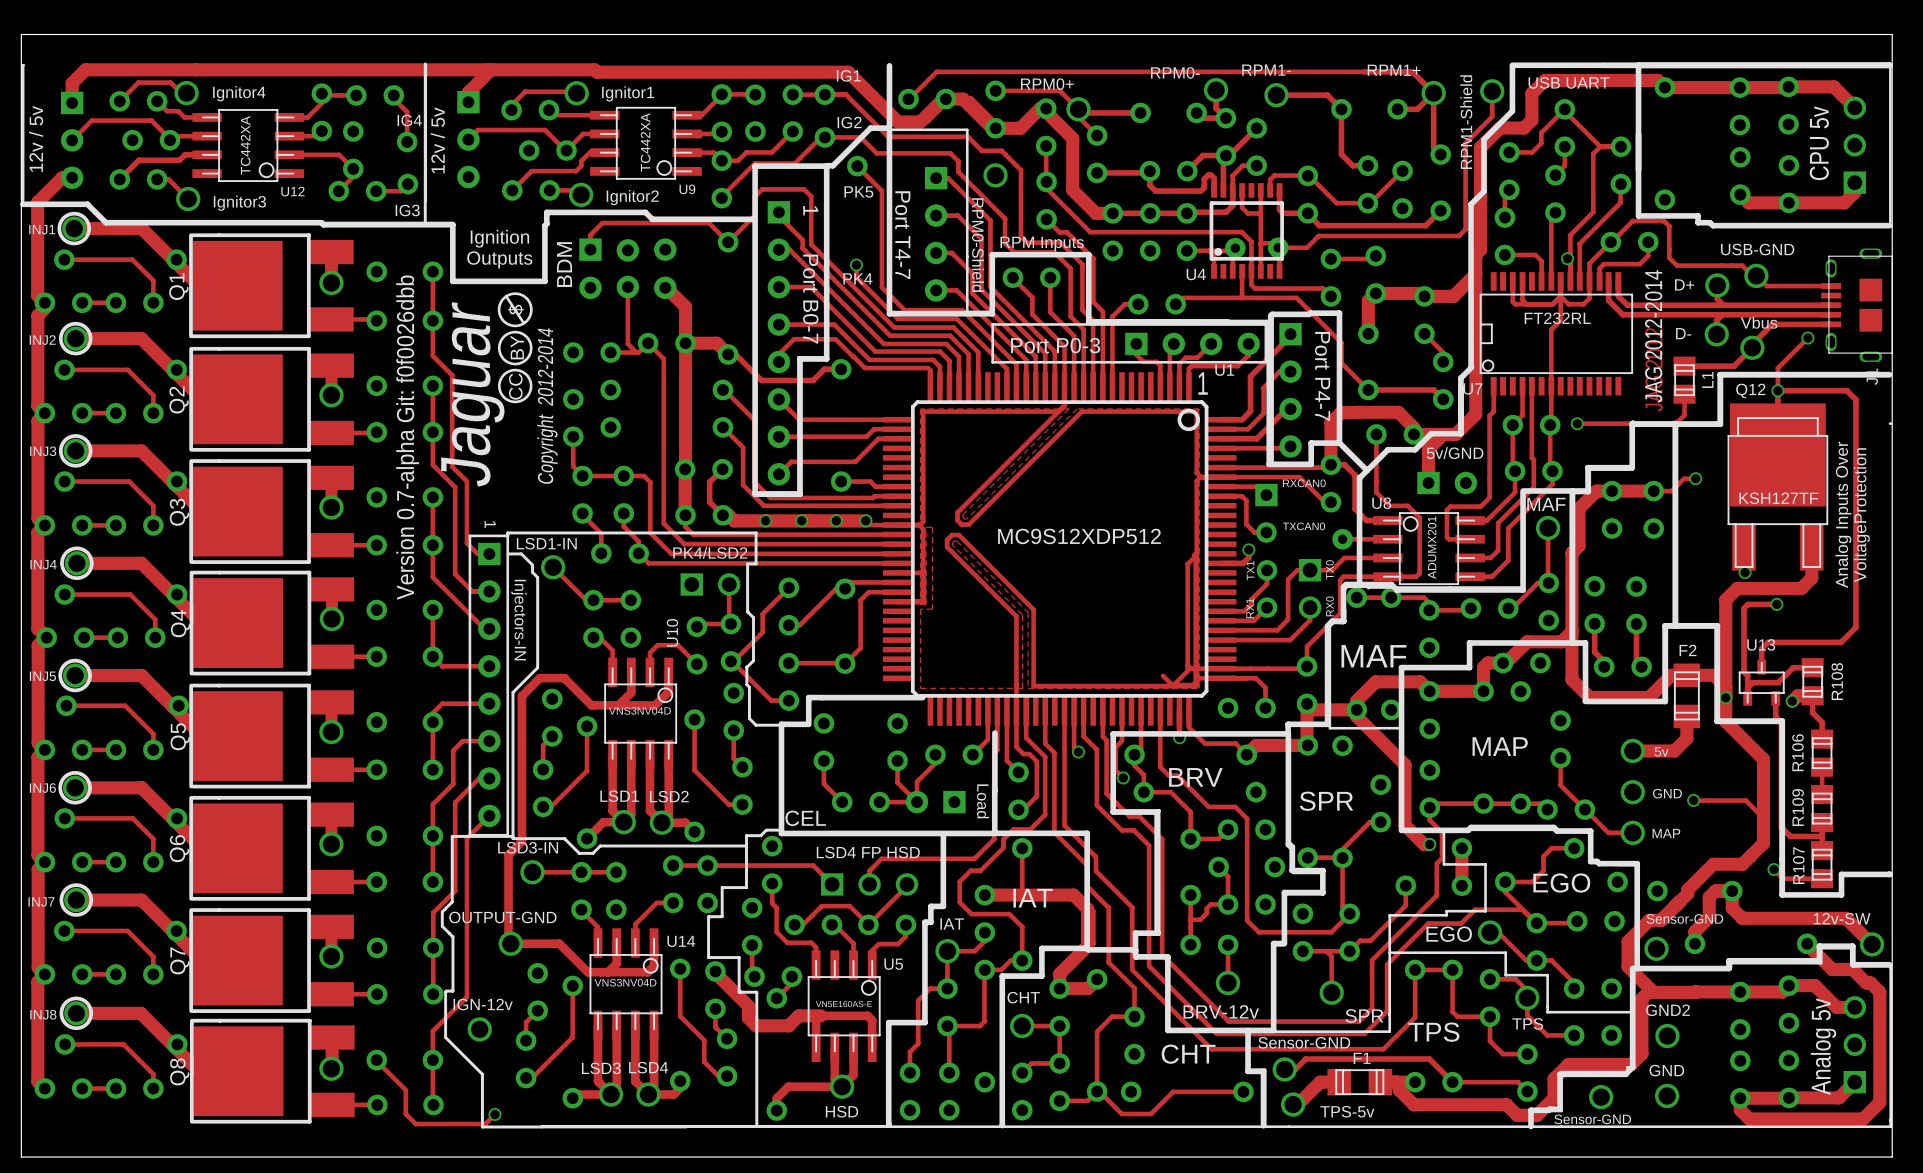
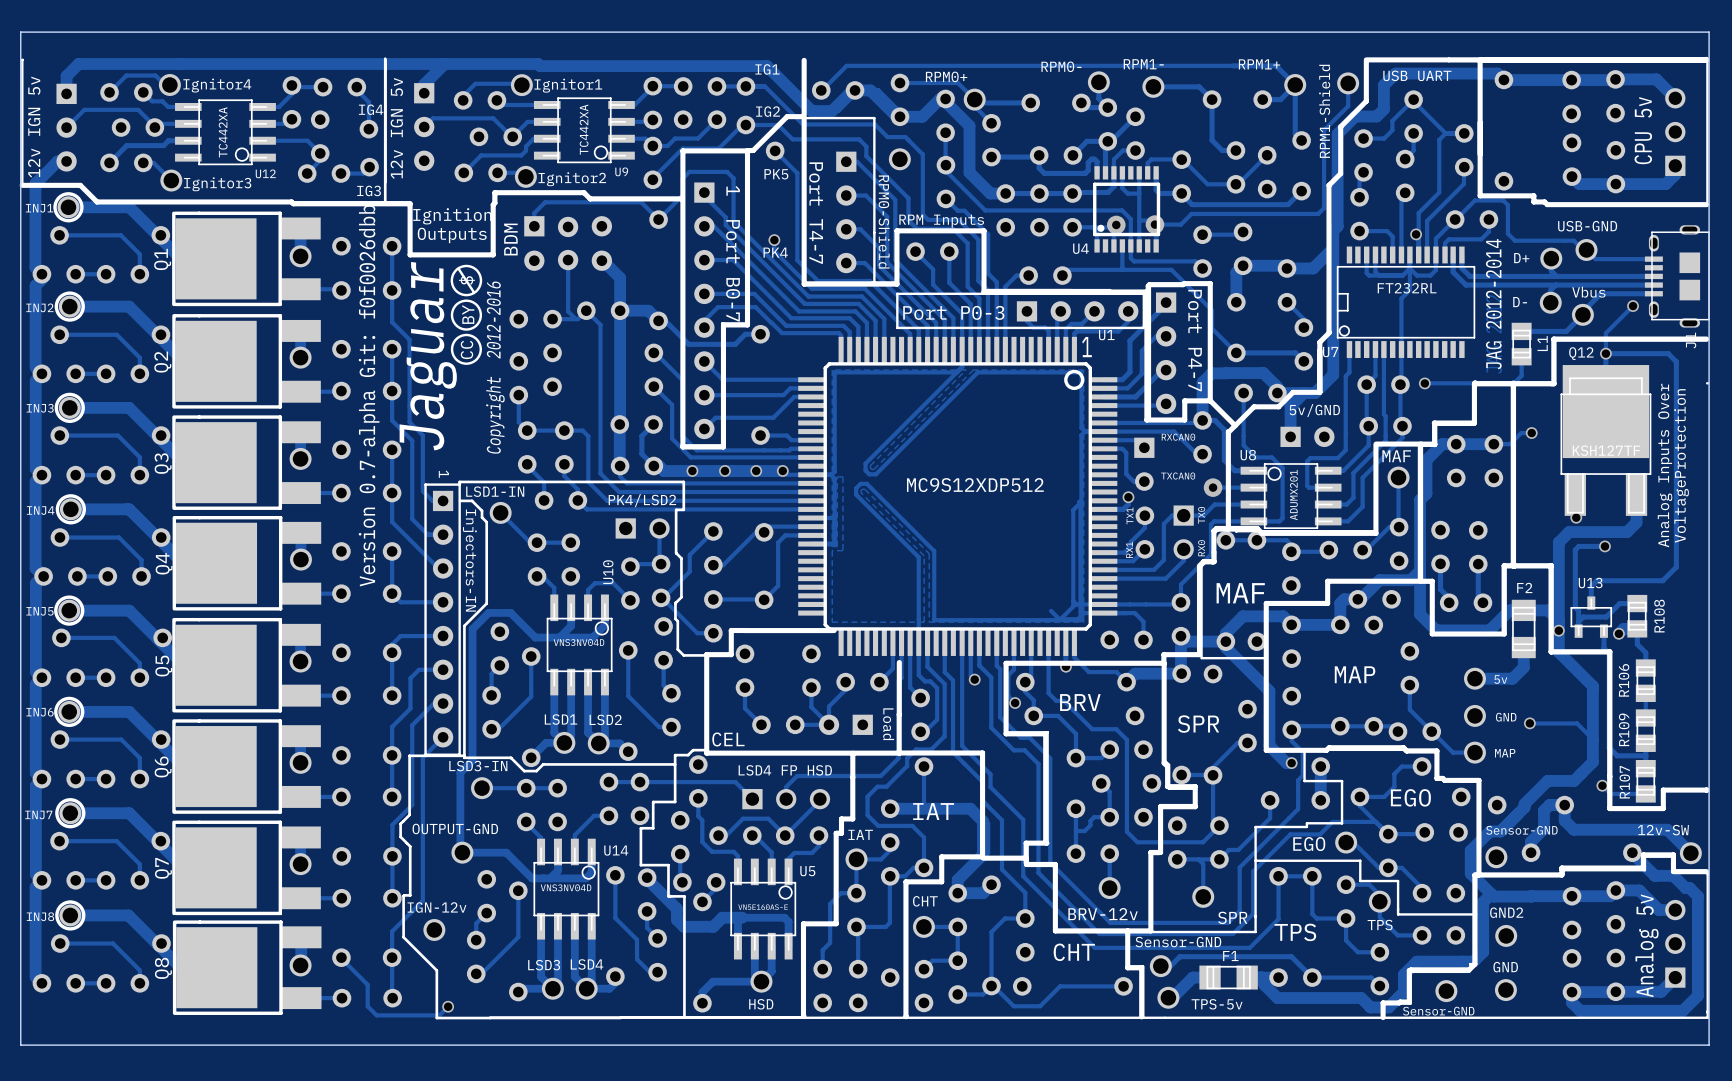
text: 12v / 5v (36, 138) -> 12v IGN 5v (34, 127)
text: 12v / 5v (437, 140) -> 12v IGN 5v (396, 128)
text: Copyright 2012-2014 (547, 406) -> Copyright 2012-2016 (495, 367)

